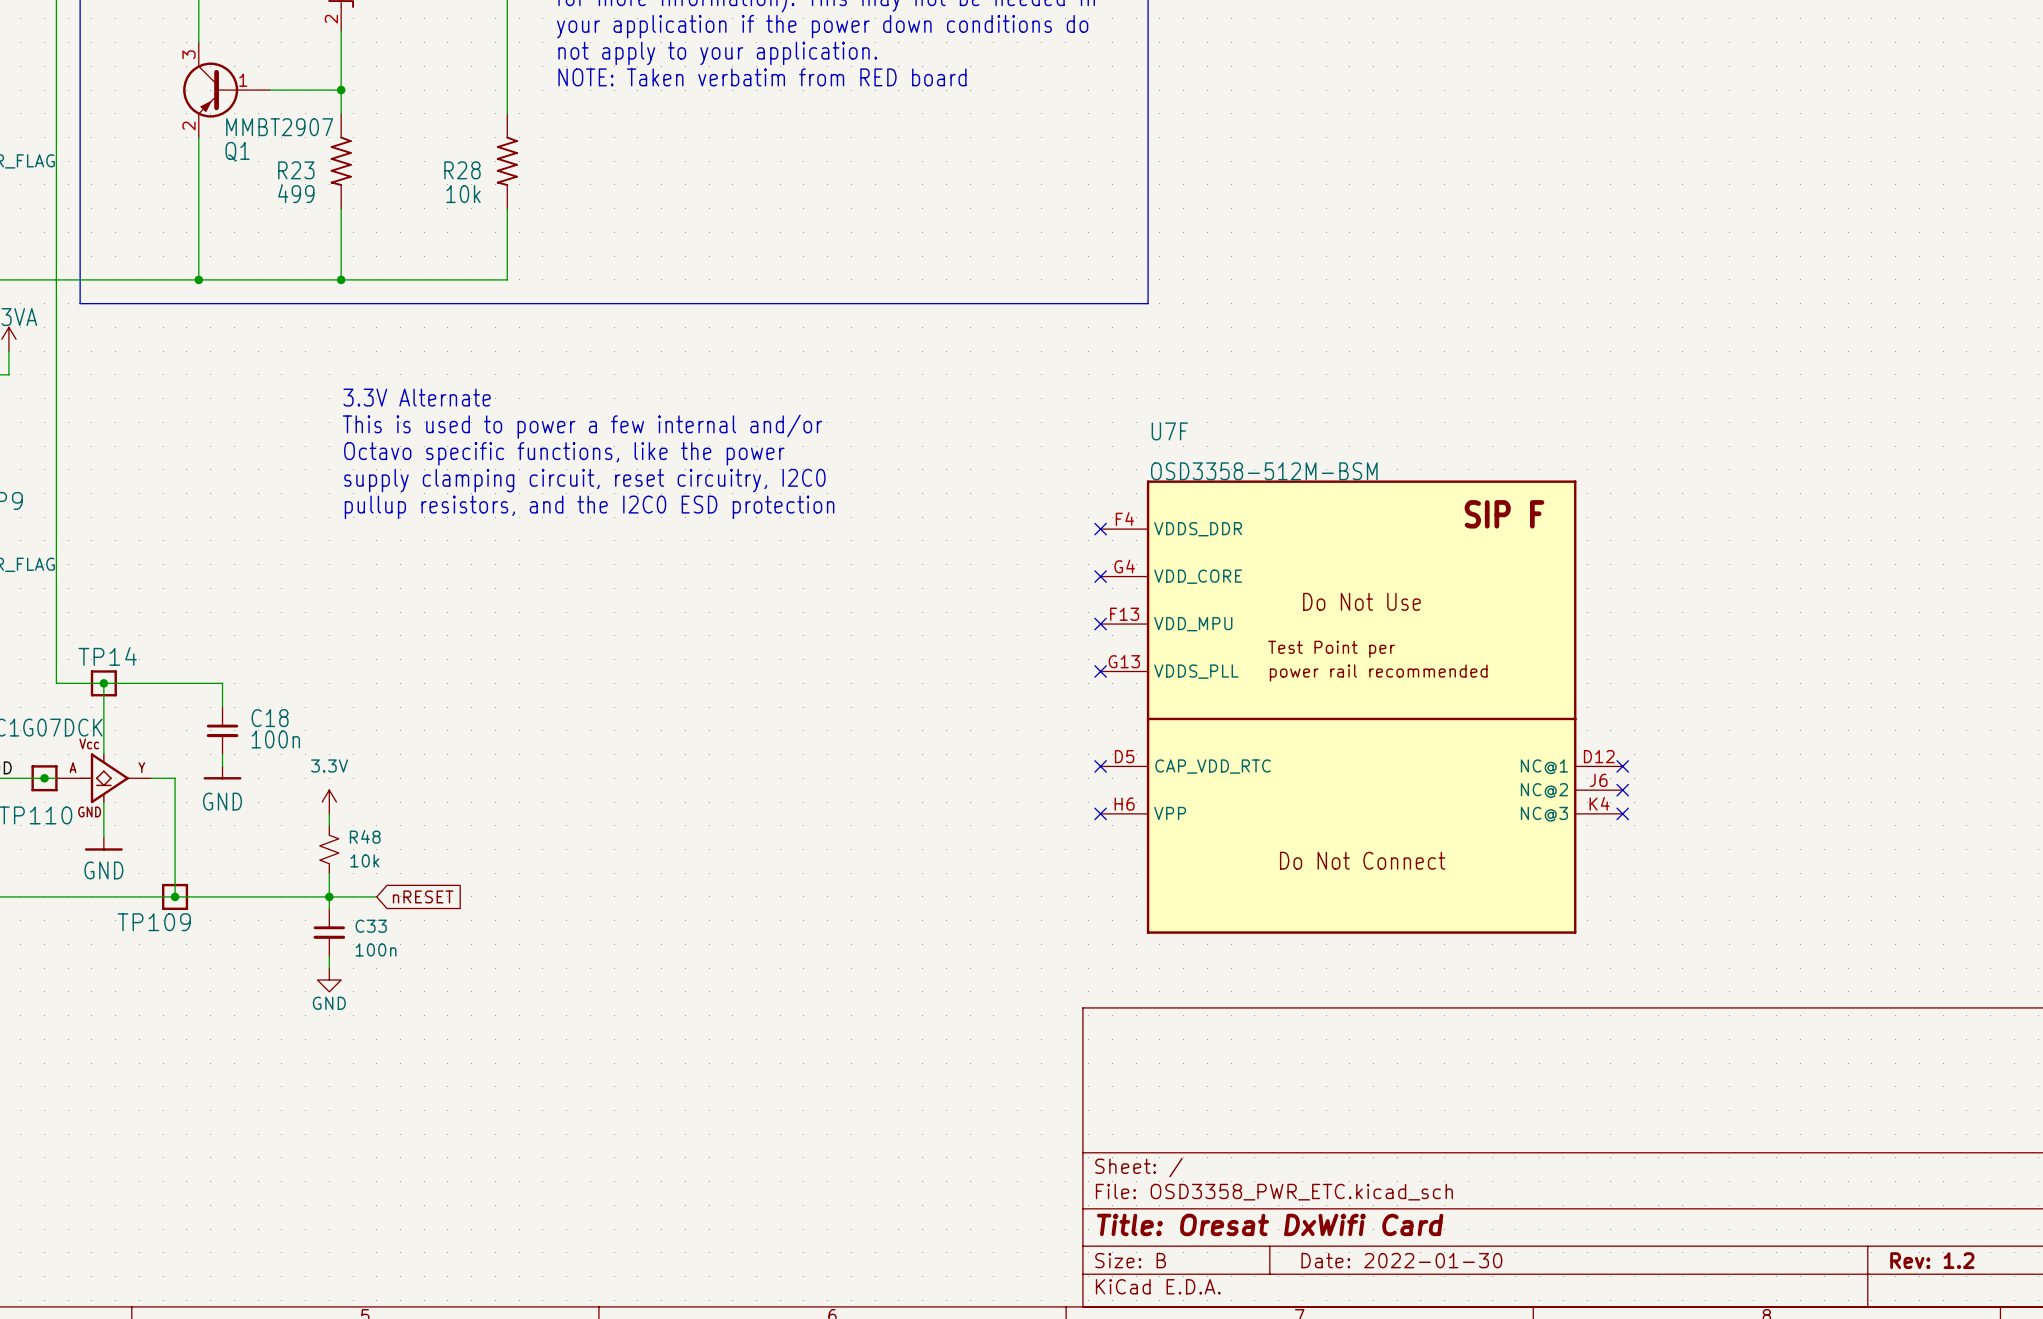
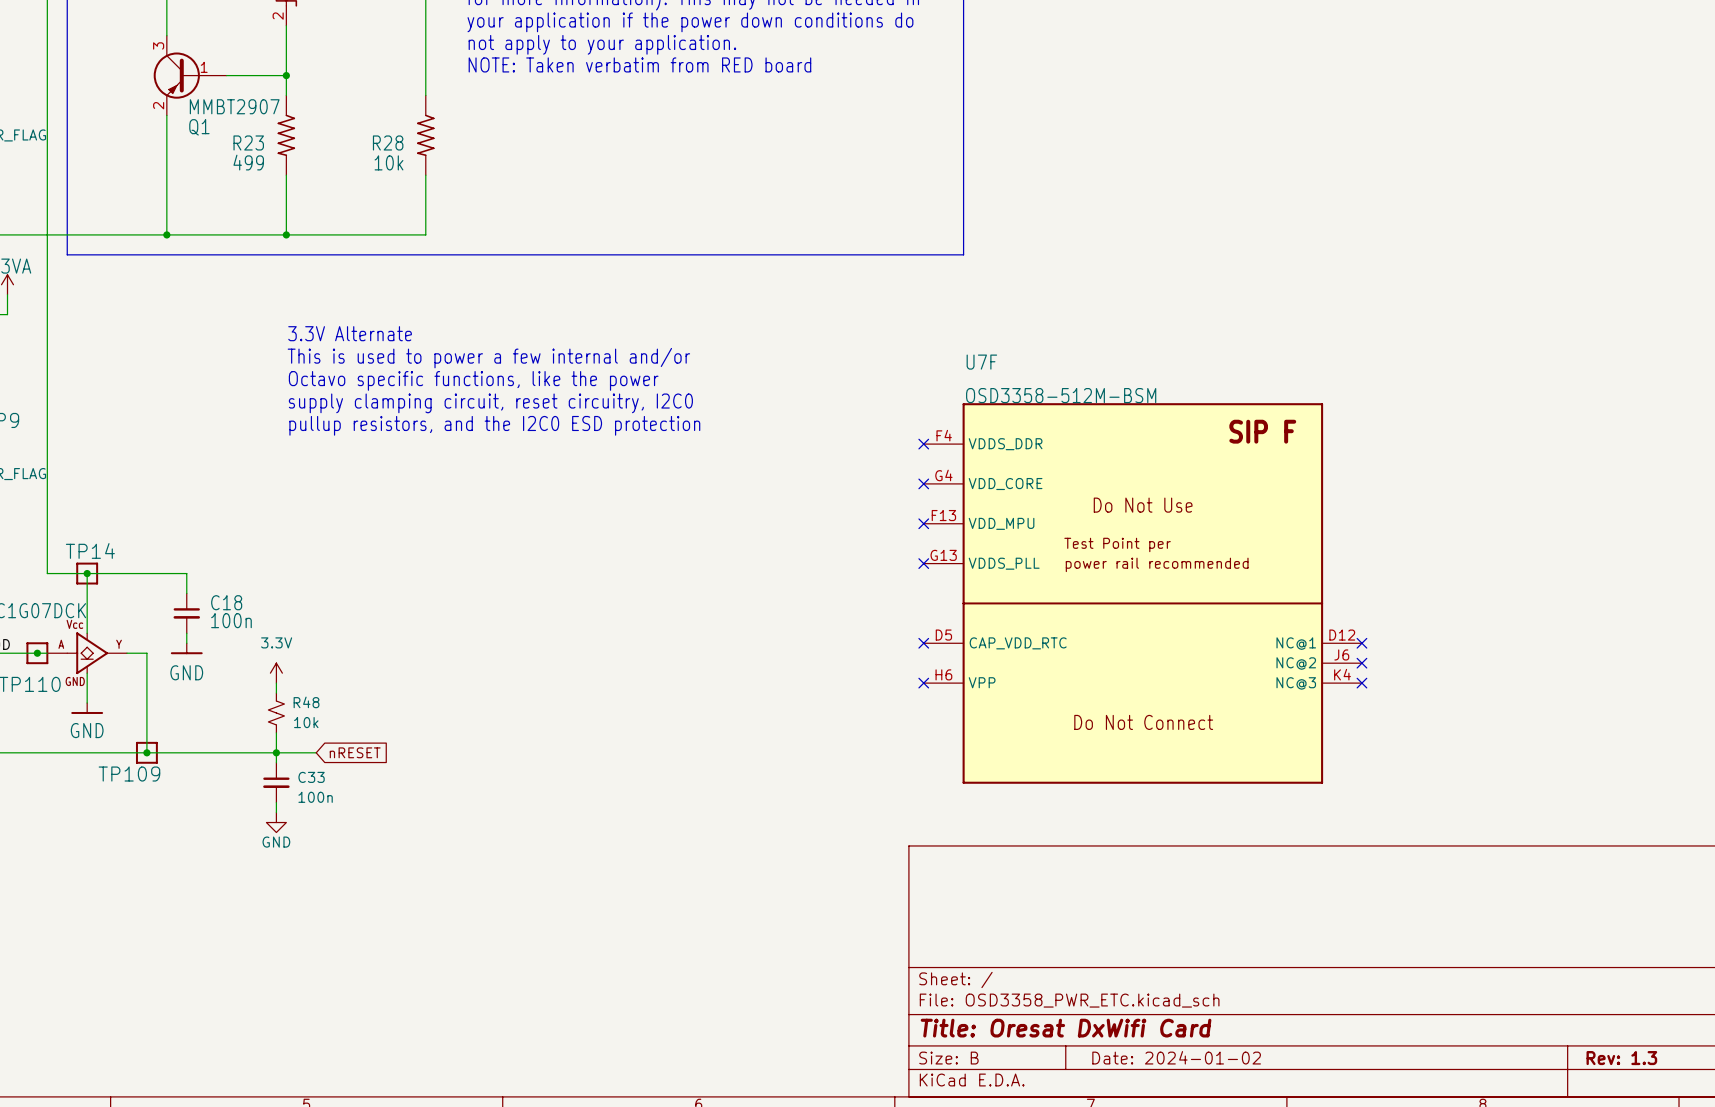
title block: Date: 2022-01-30 (1401, 1260) -> Date: 2024-01-02 (1176, 1057)
title block: Rev: 1.2 (1932, 1260) -> Rev: 1.3 (1621, 1058)

